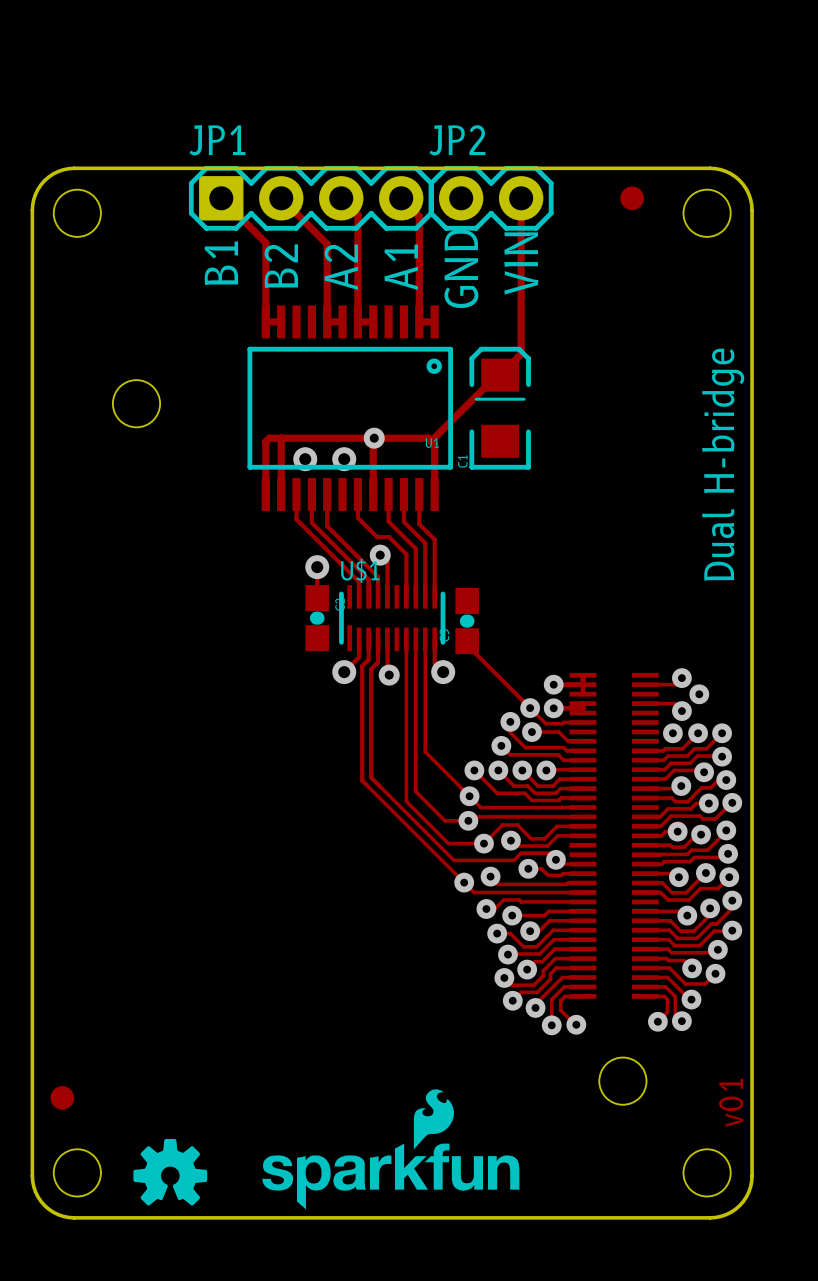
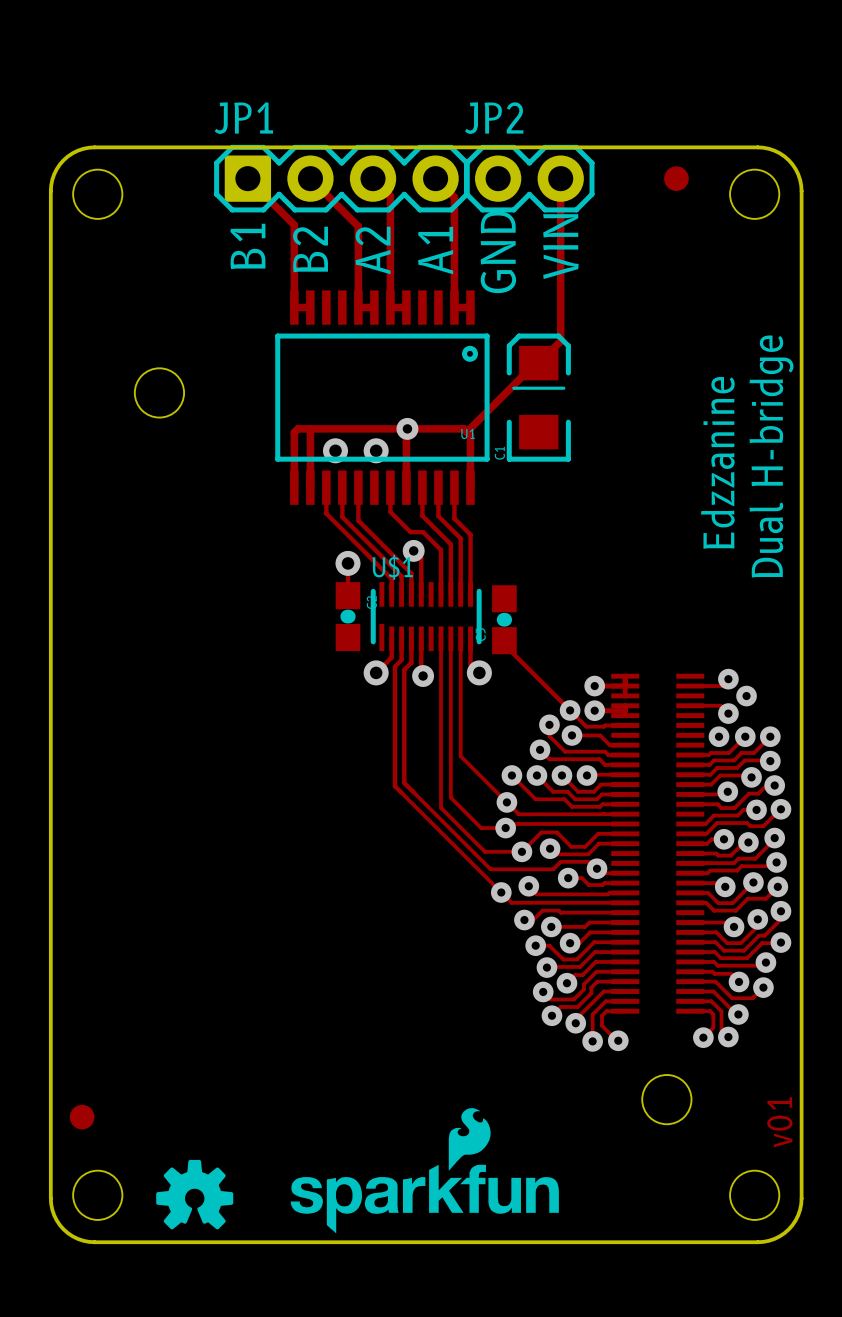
text: none -> Edzzanine (717, 462)

